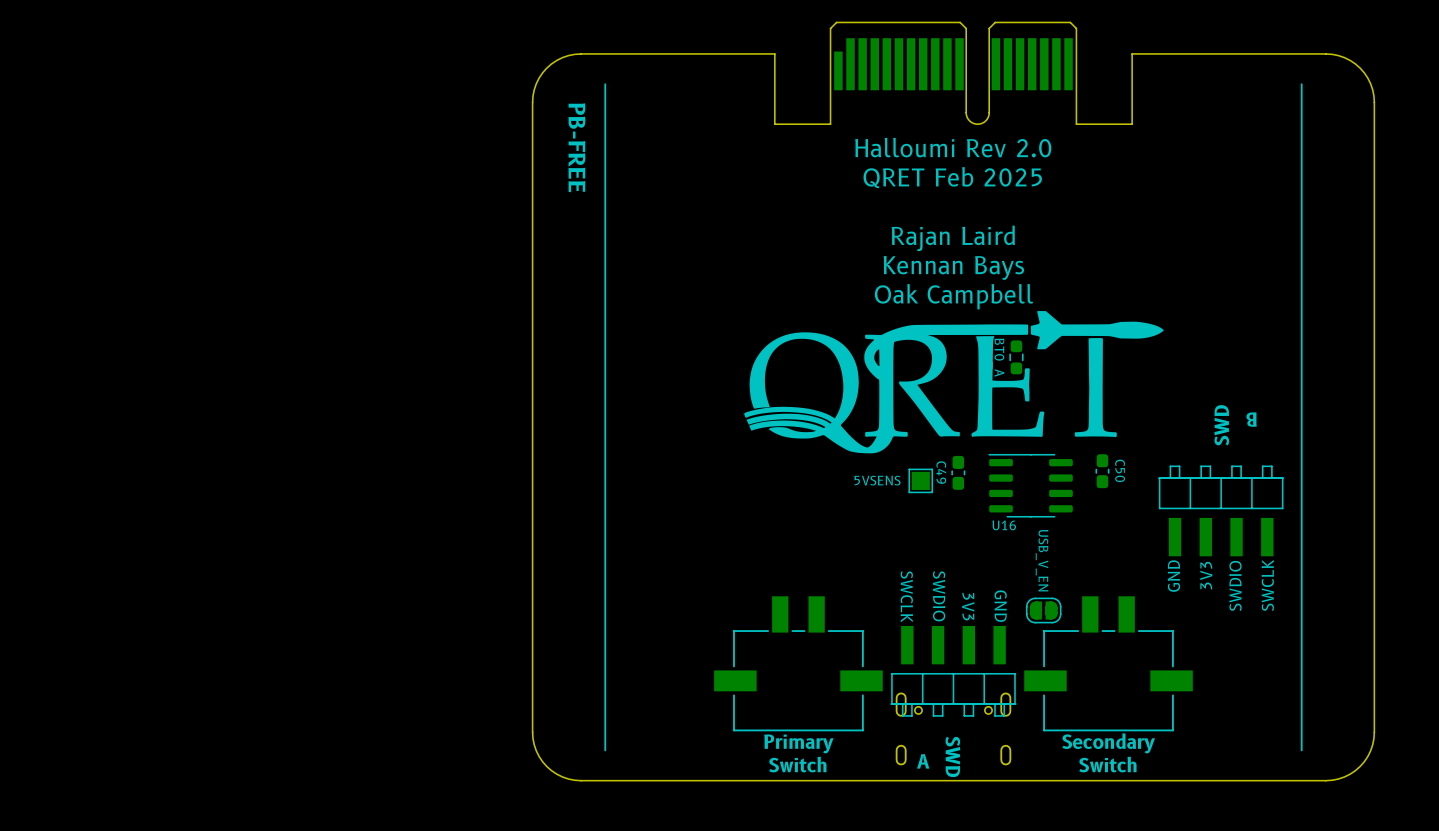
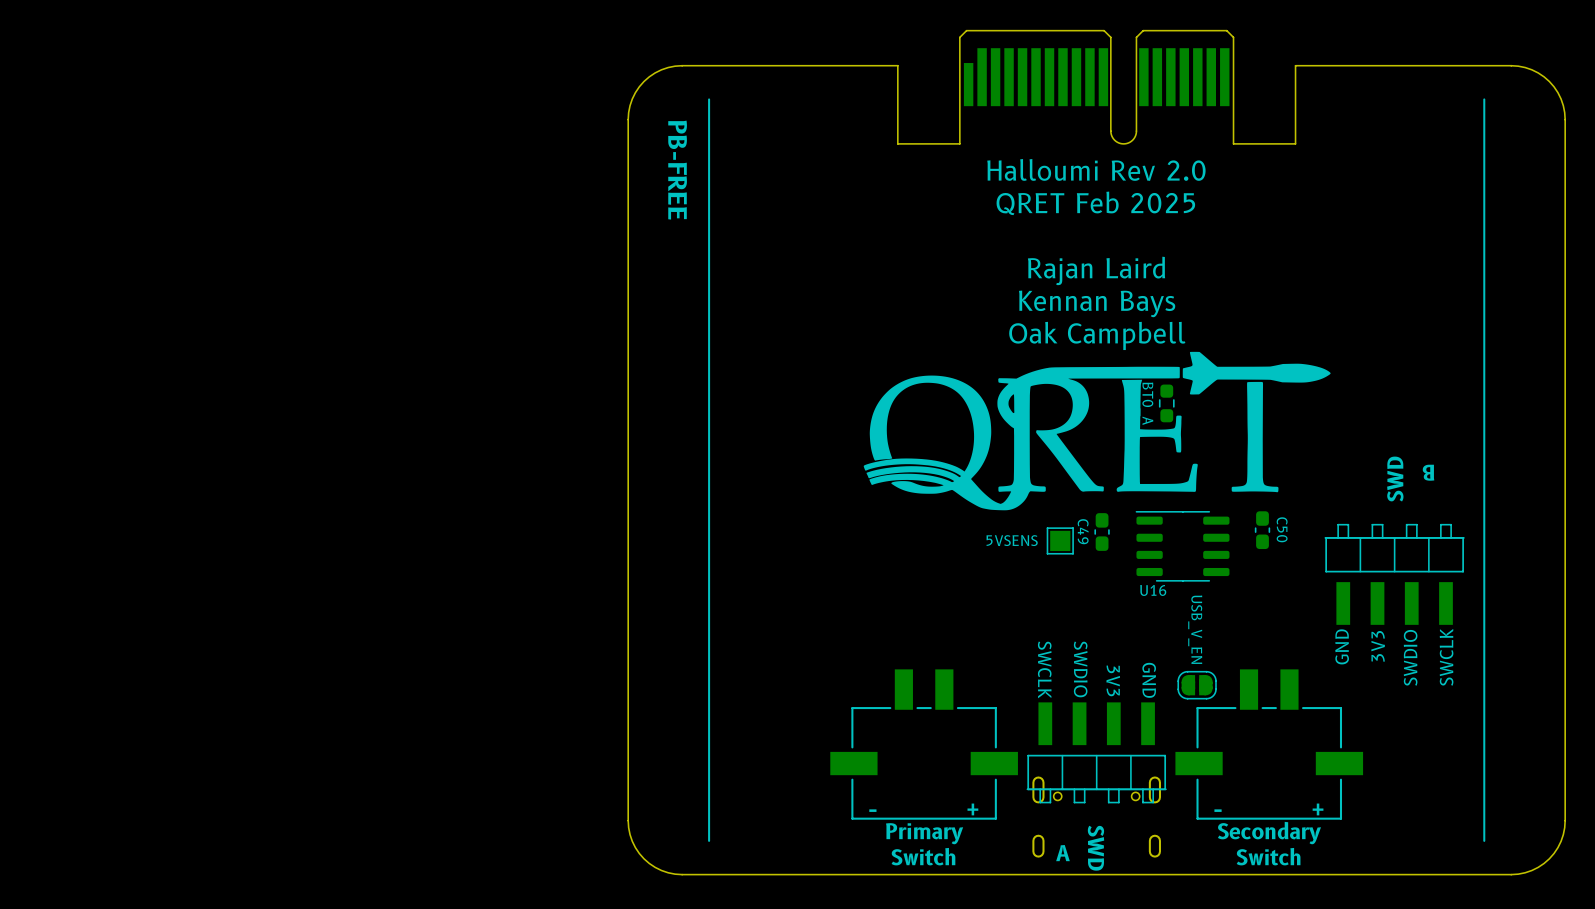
text: none -> - + (923, 809)
text: none -> - + (1268, 809)

